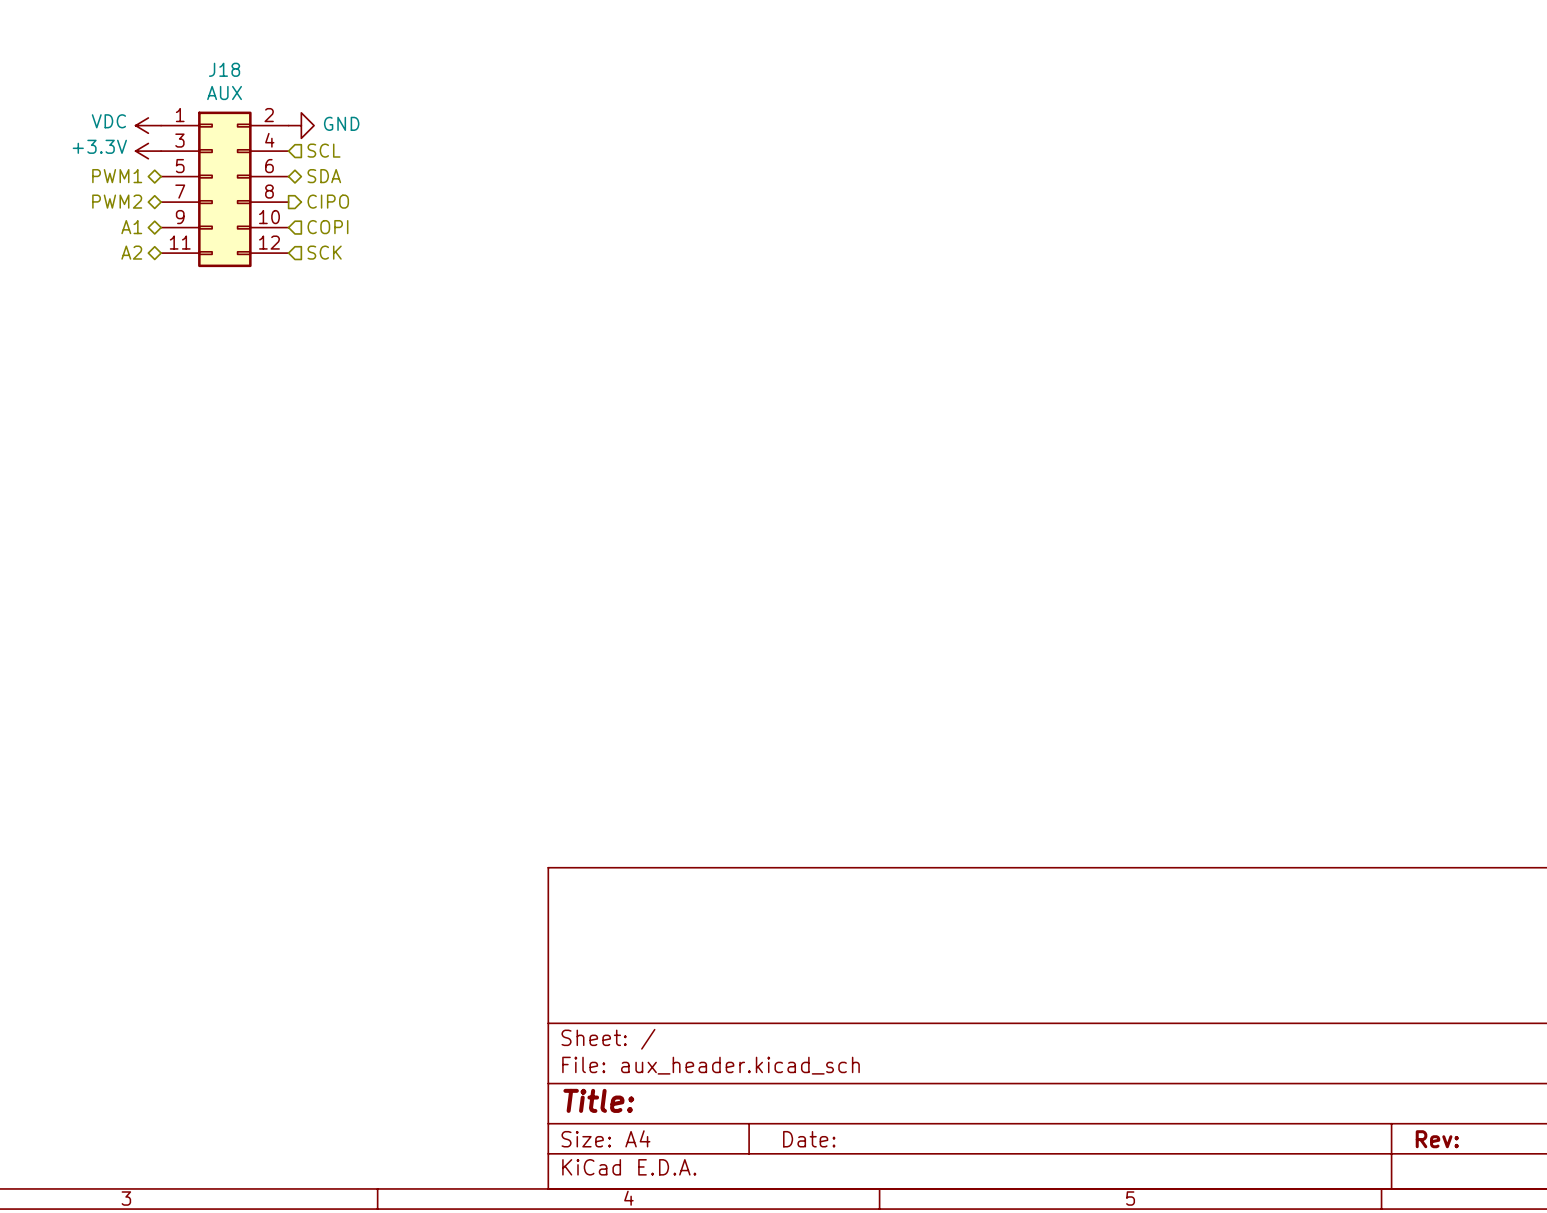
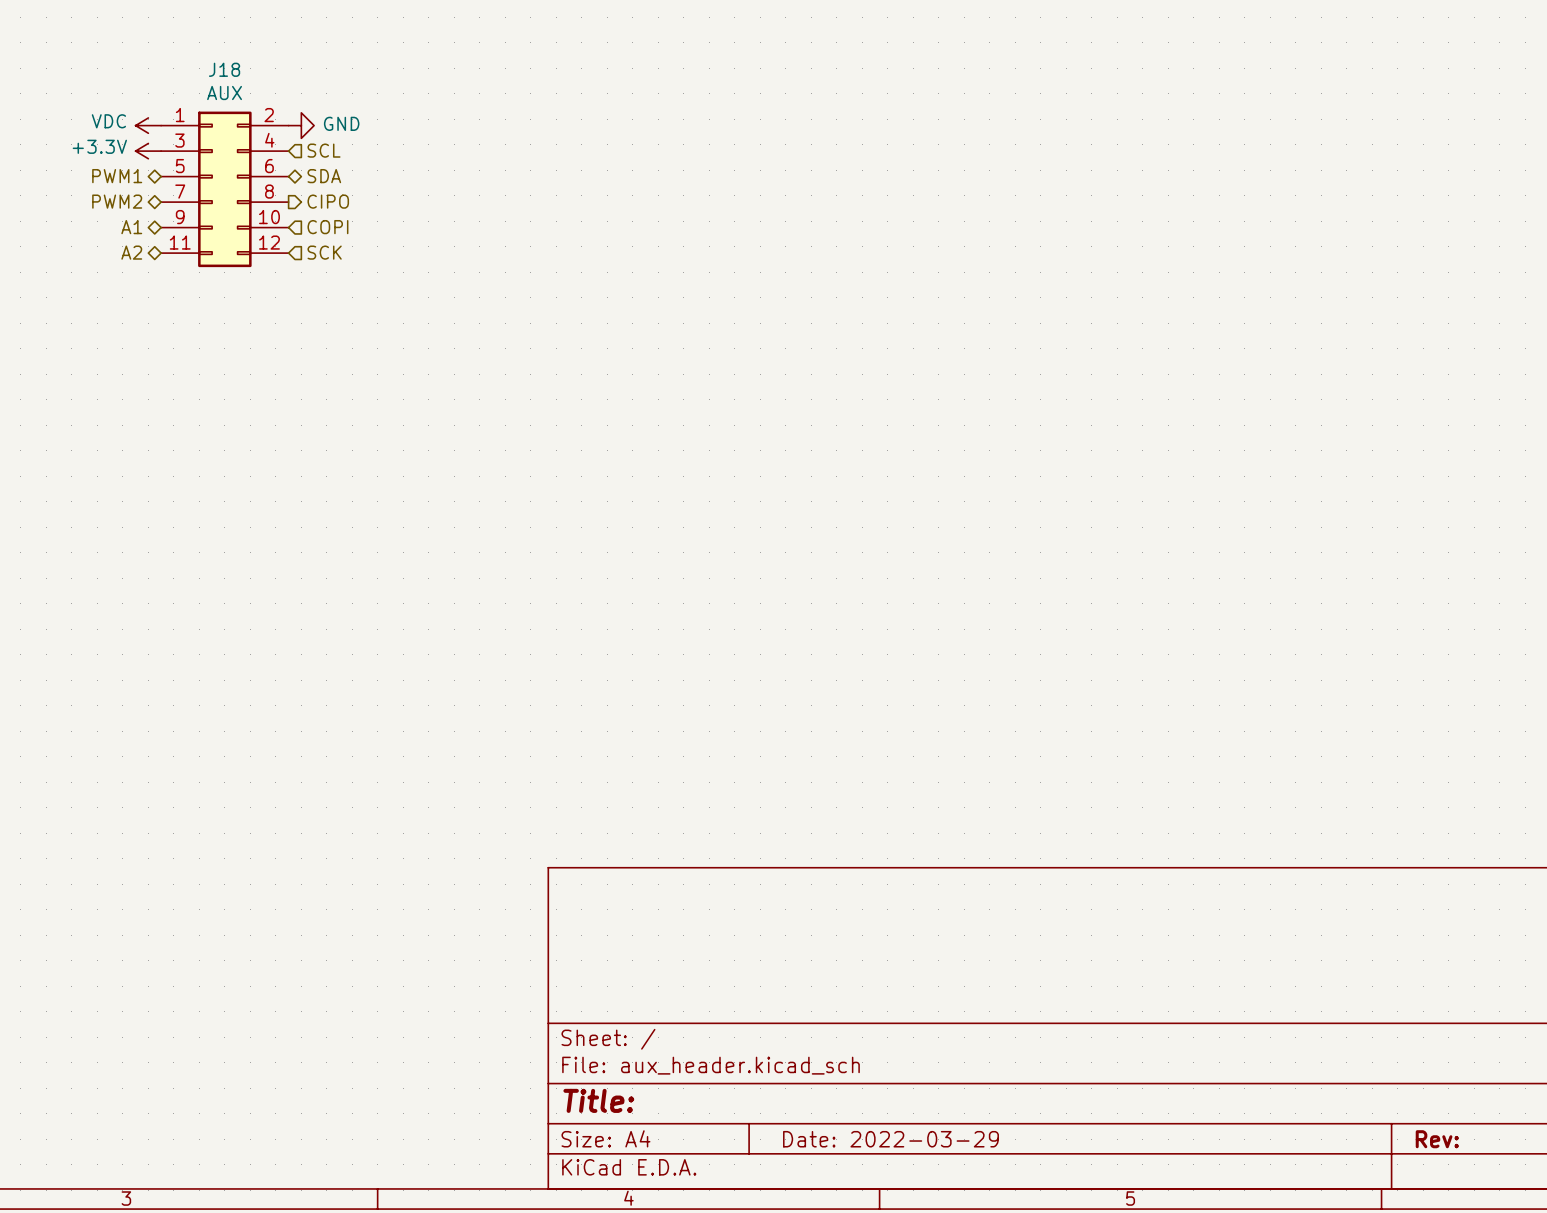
title block: Date: (809, 1139) -> Date: 2022-03-29 (891, 1139)

